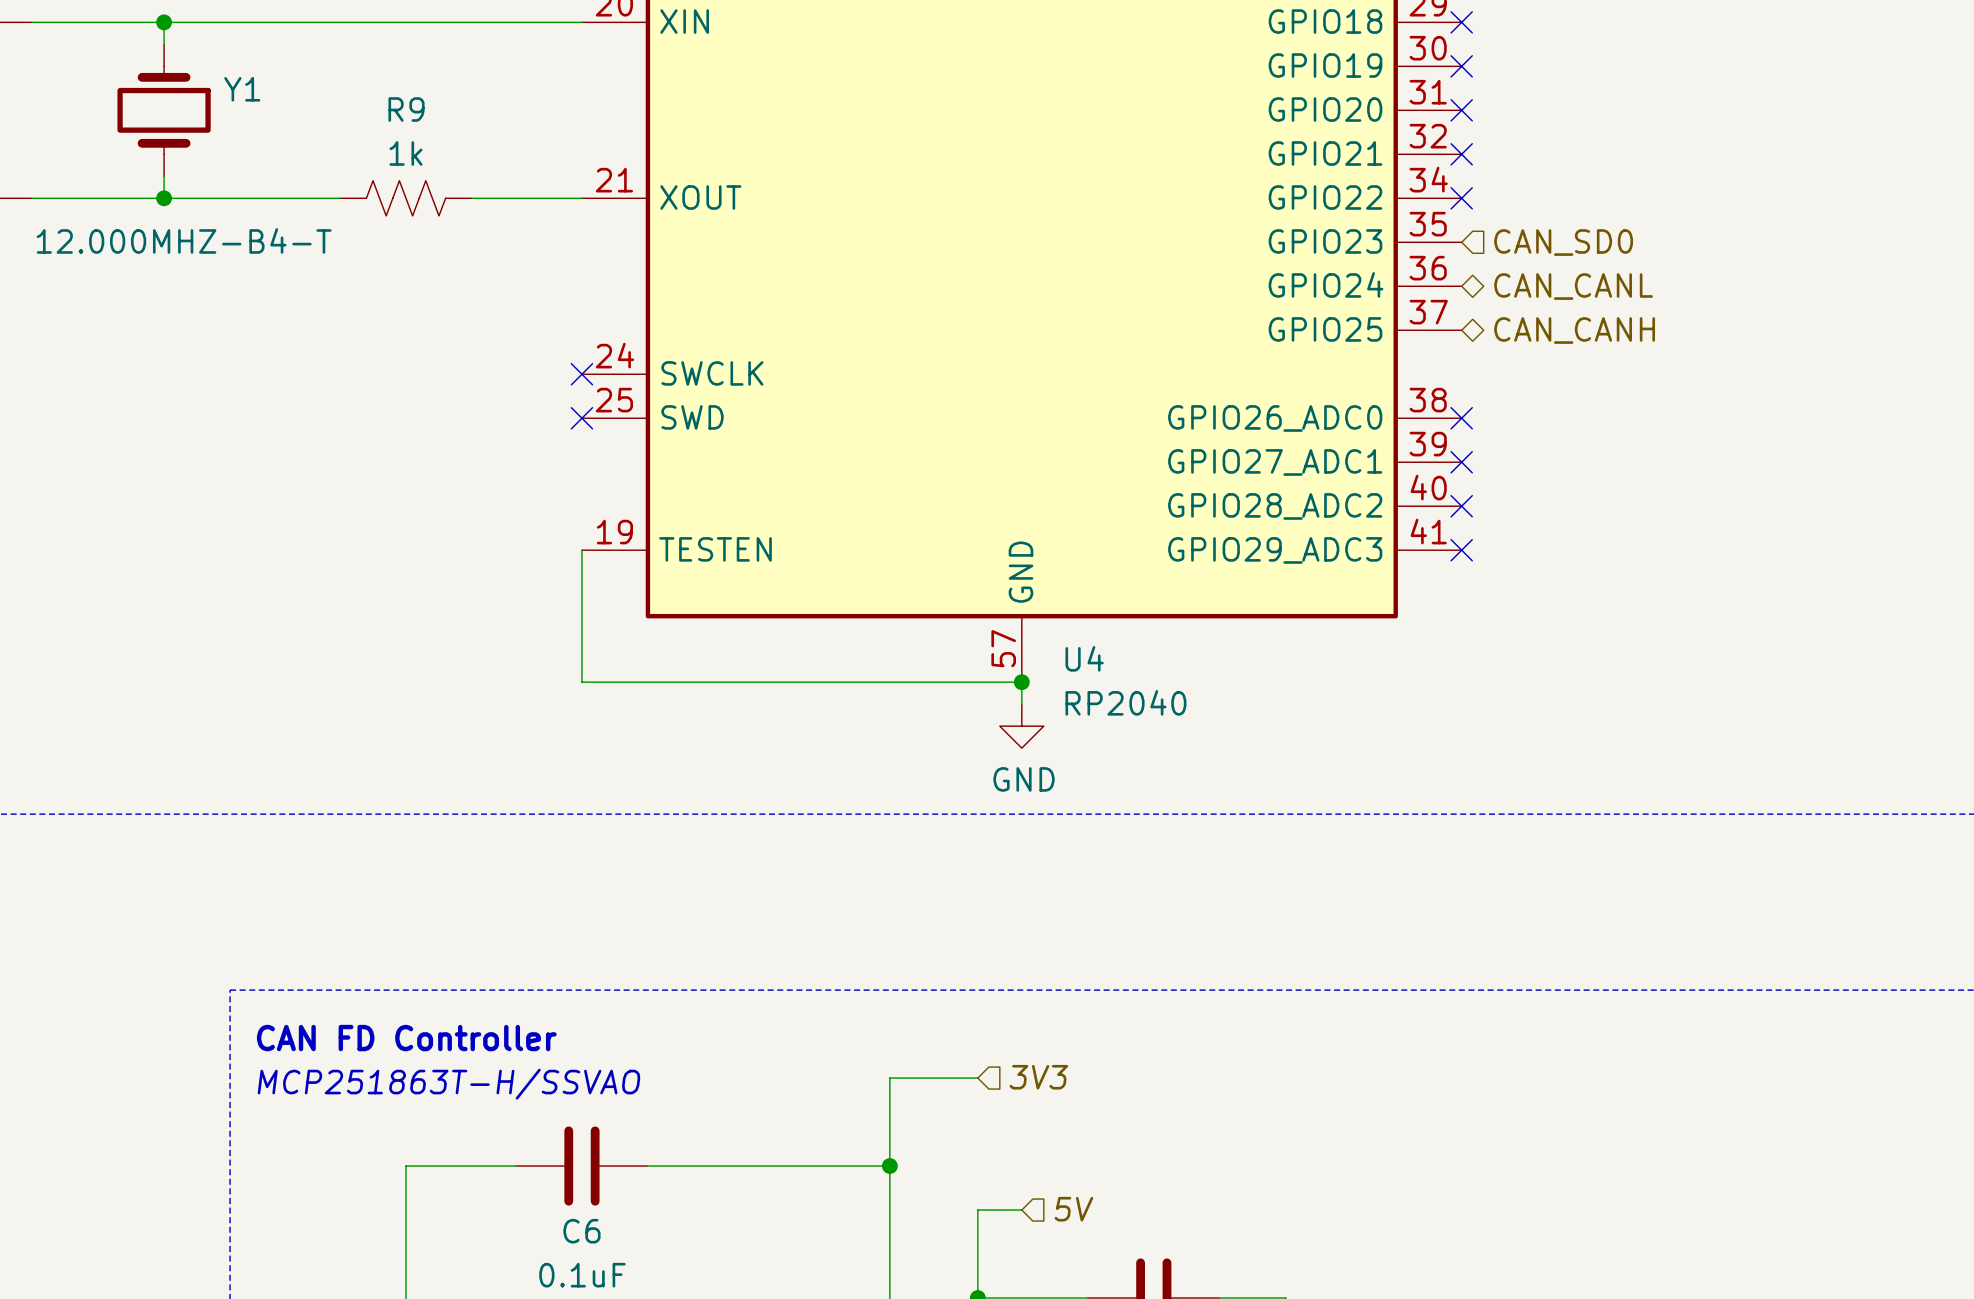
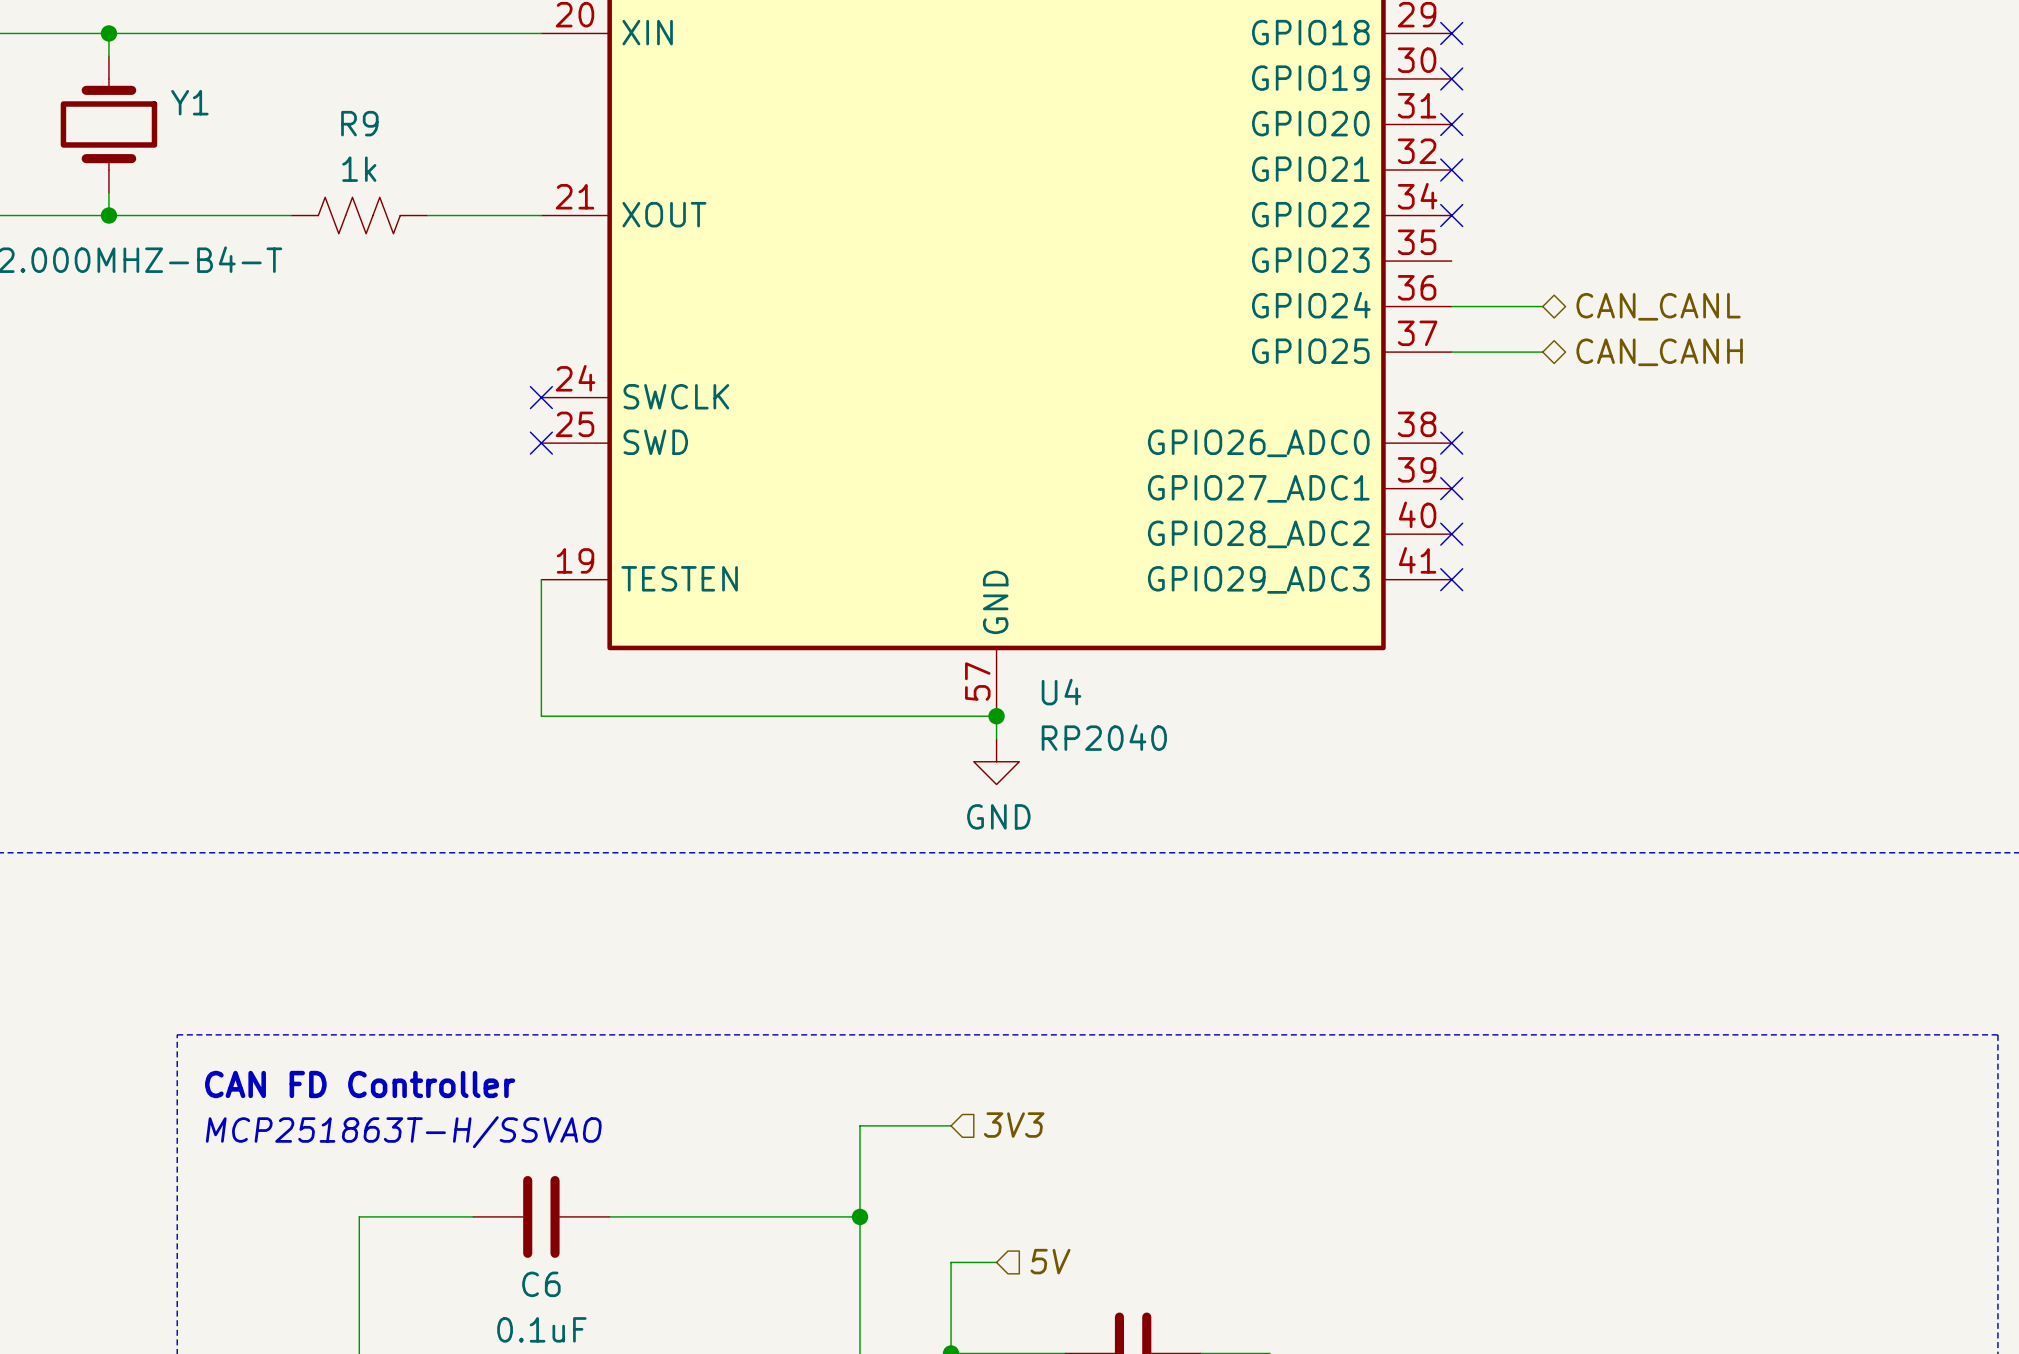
hierarchical label: CAN_SD0 (1563, 242) -> none
wire: none -> (1451, 306) (1542, 306)
hierarchical label position: CAN_CANL (1573, 286) -> CAN_CANL (1658, 306)
wire: none -> (1451, 352) (1542, 352)
hierarchical label position: CAN_CANH (1574, 330) -> CAN_CANH (1659, 352)

